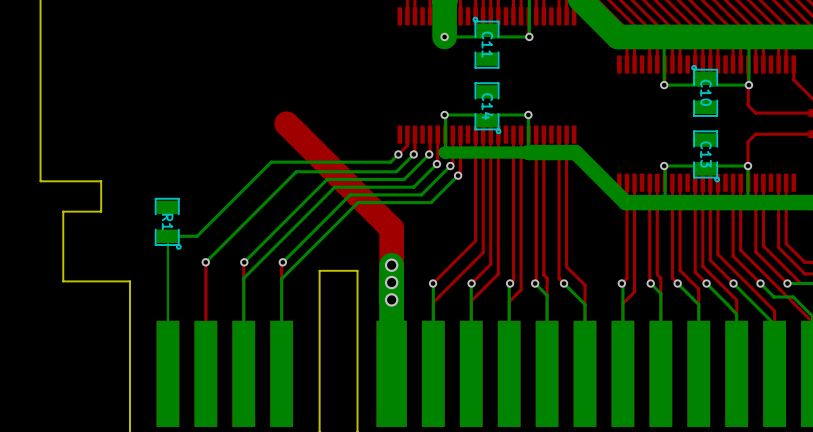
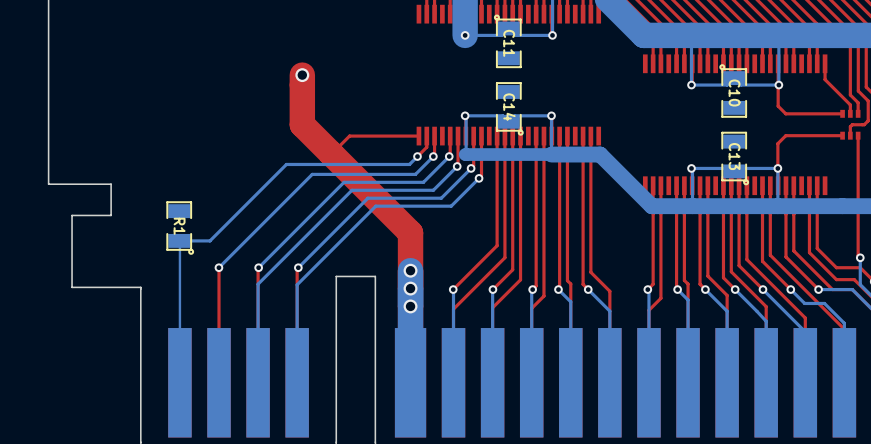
top track: none -> (302, 75) (302, 124)
via: none -> (302, 75)
top track: none -> (418, 136) (349, 136) (331, 154)

